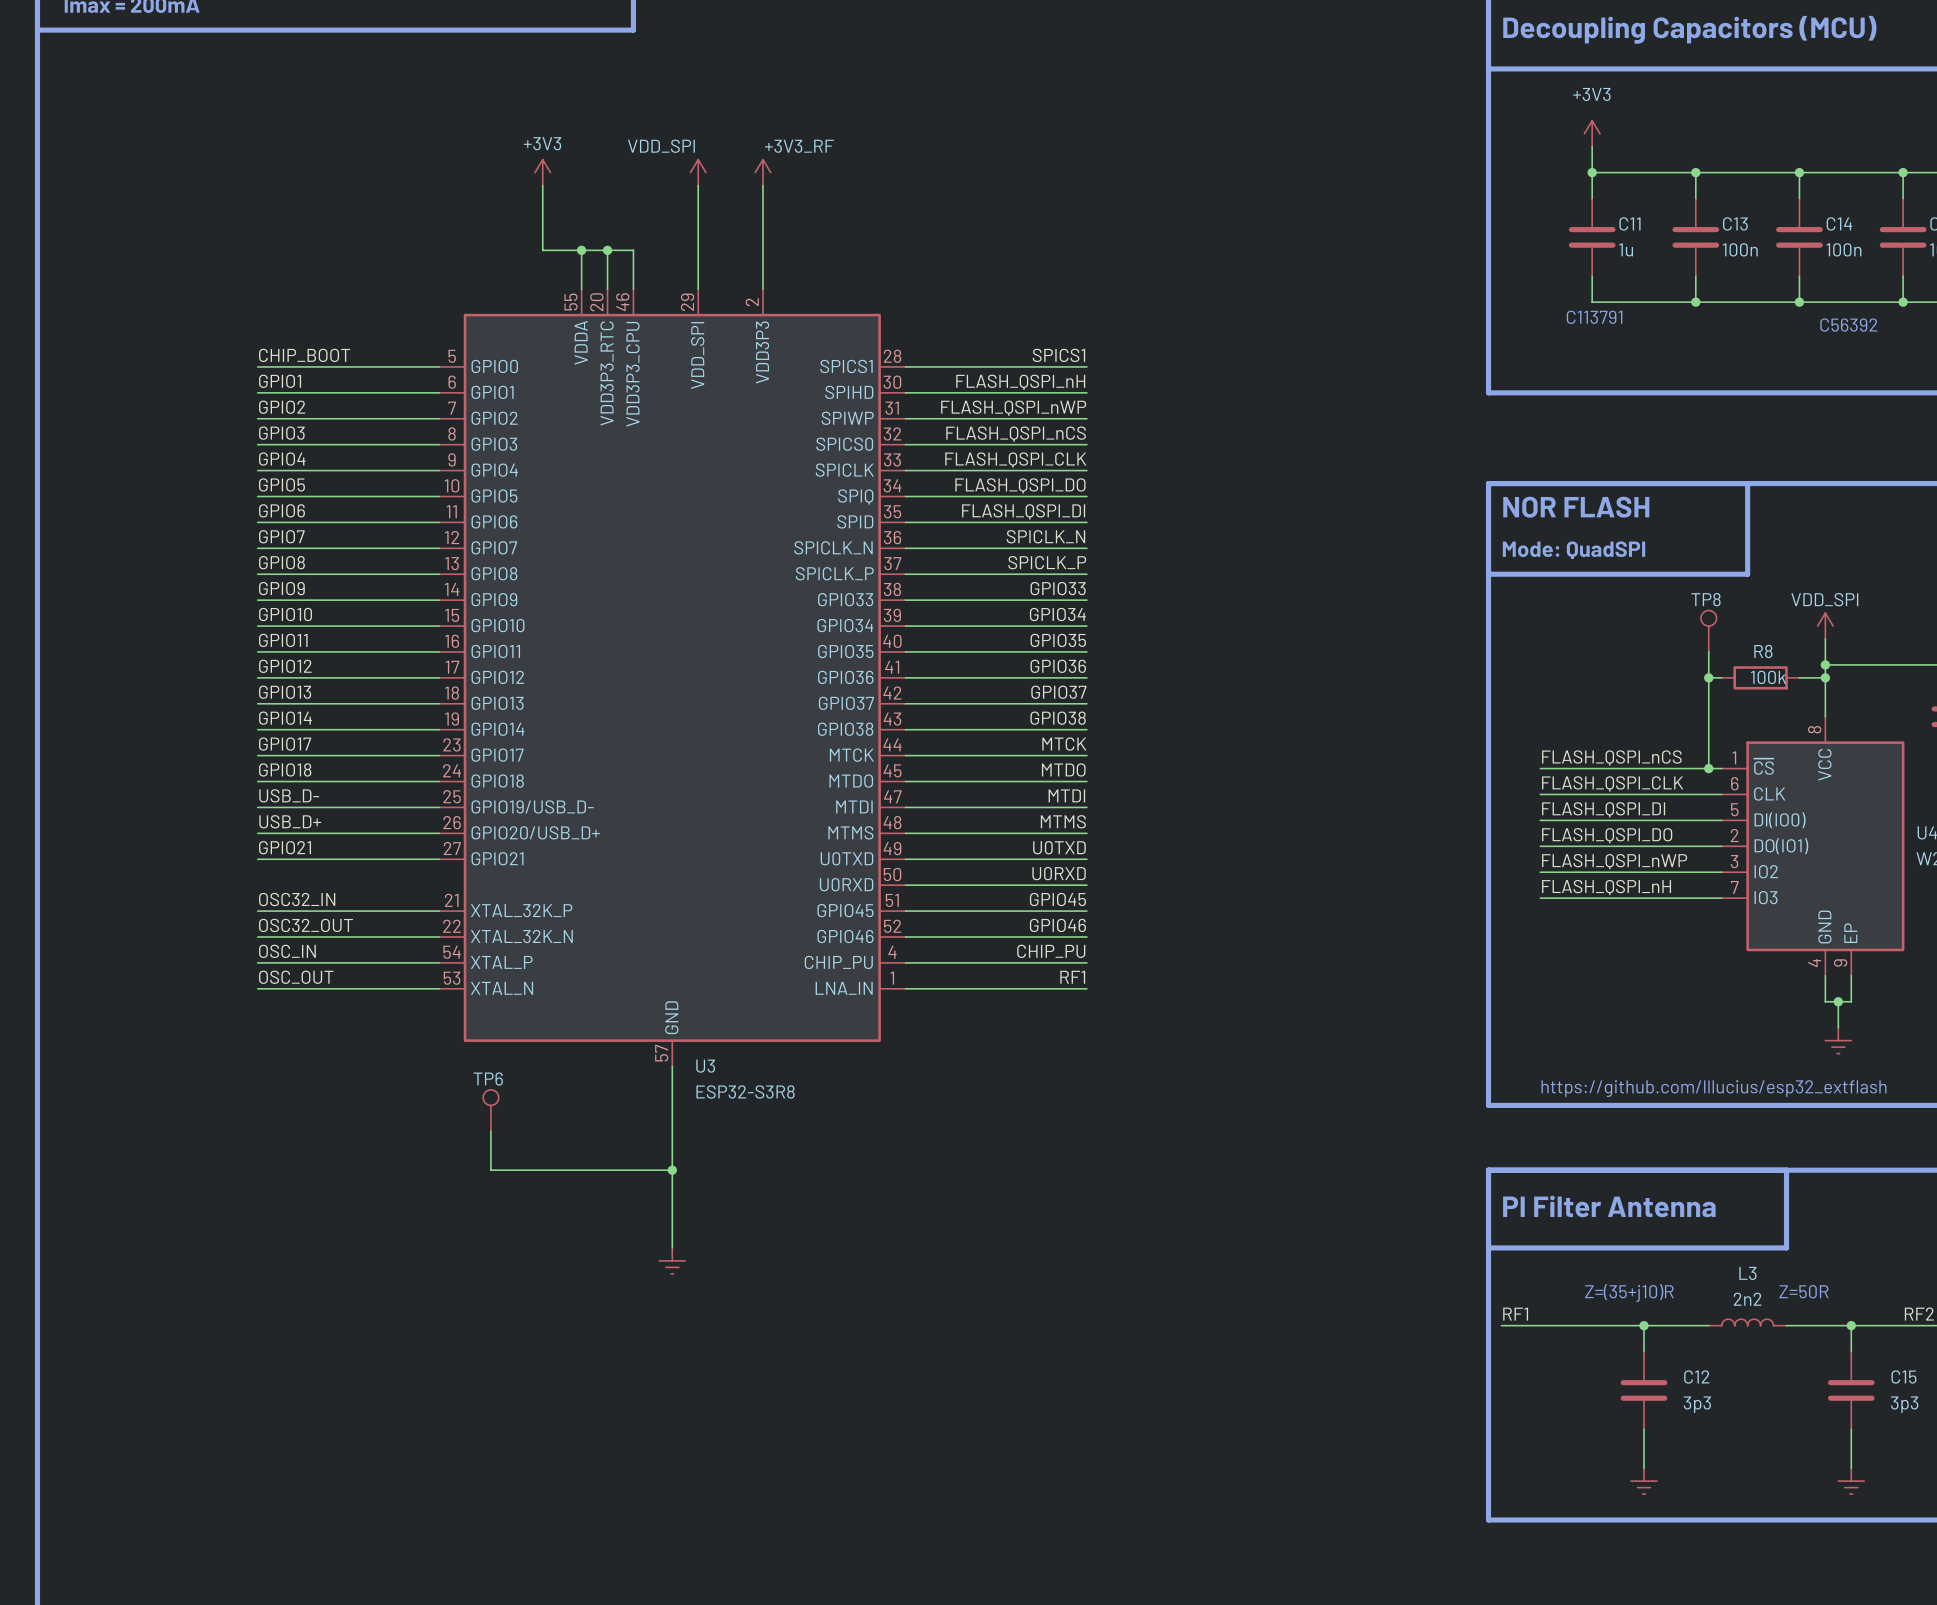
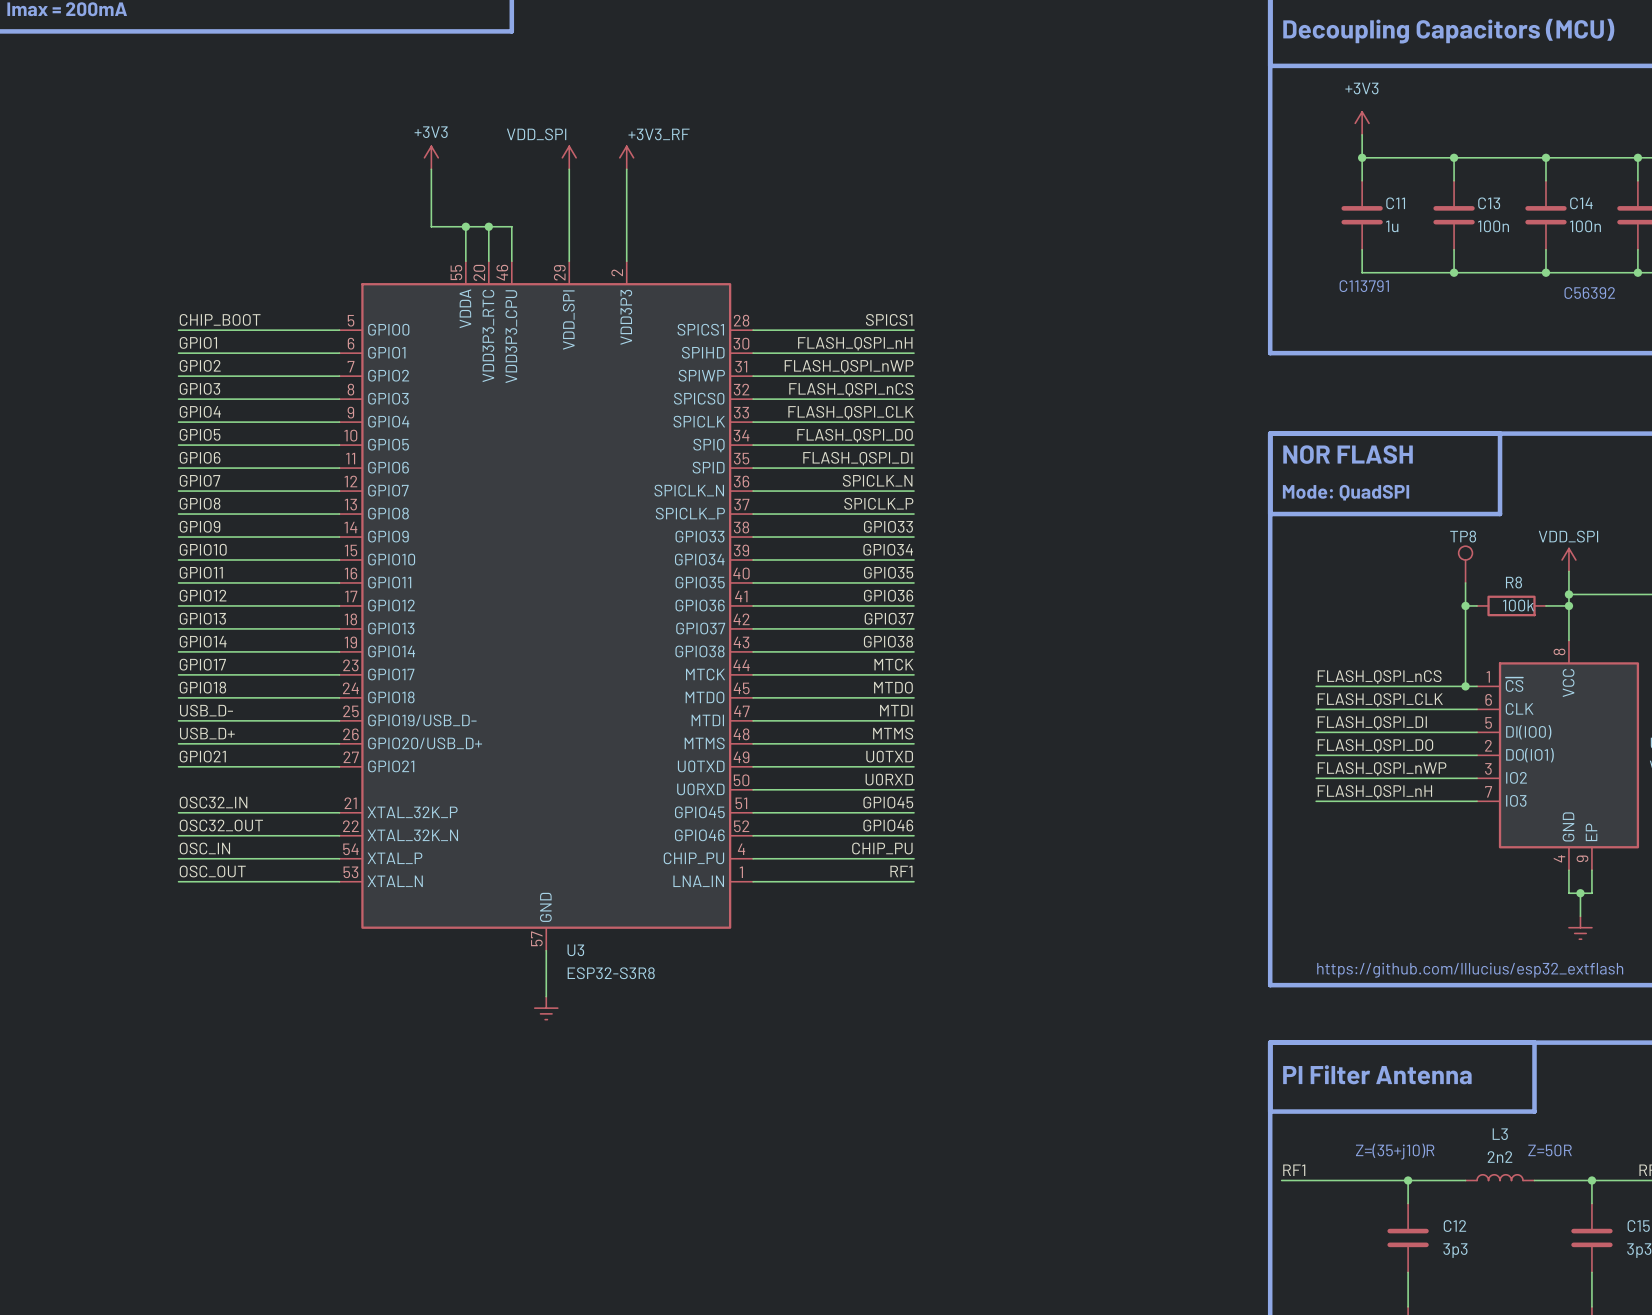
TP6: (490, 1110) -> none
wire: (672, 1118) (672, 1247) -> none
wire: (490, 1131) (490, 1170) (672, 1170) -> none
junction: (672, 1170) -> none
power symbol position: (672, 1260) -> (546, 1008)

